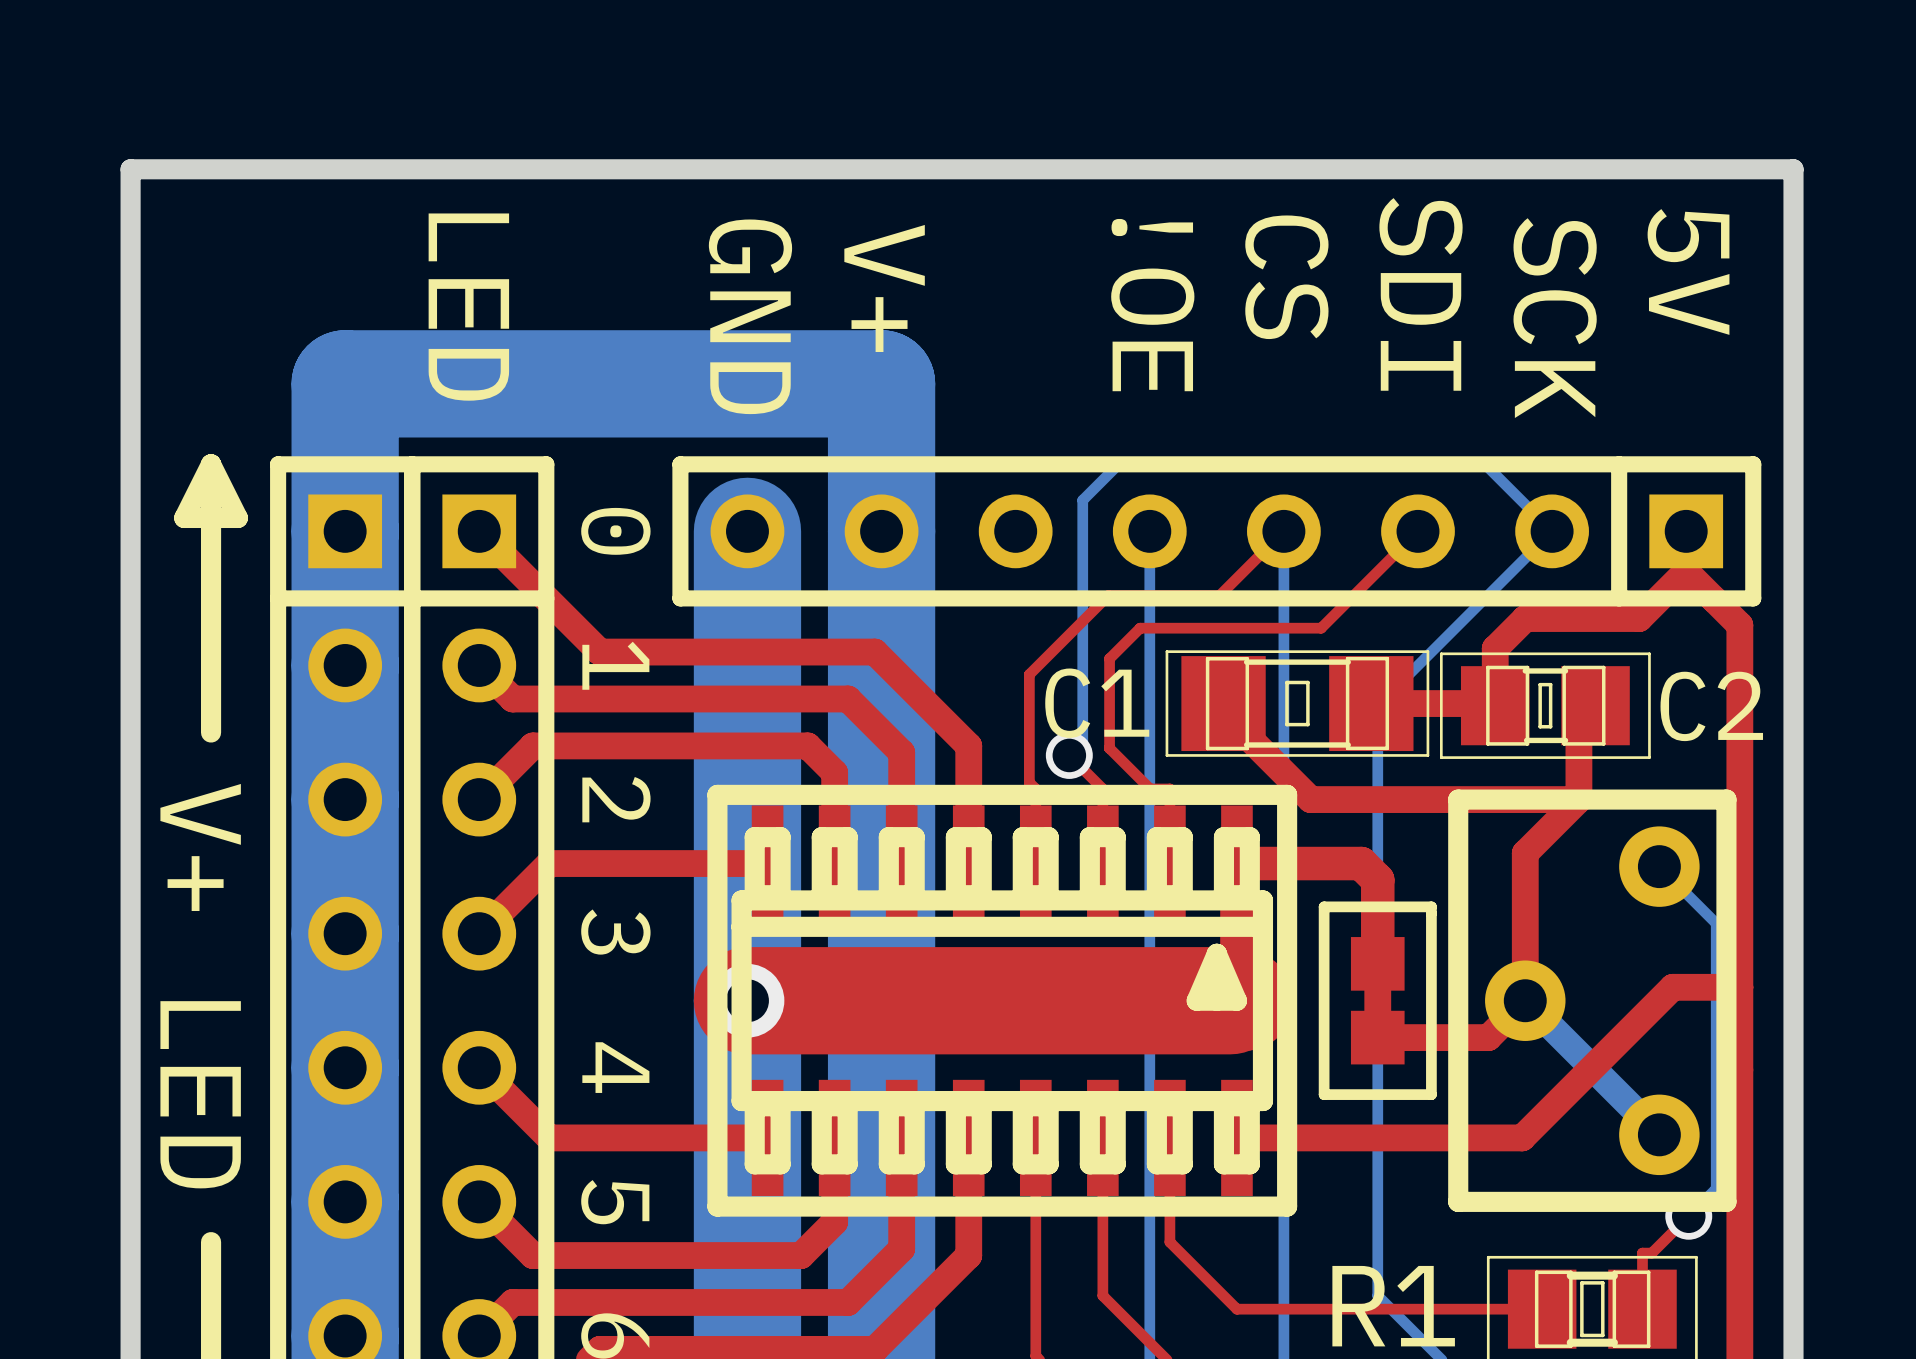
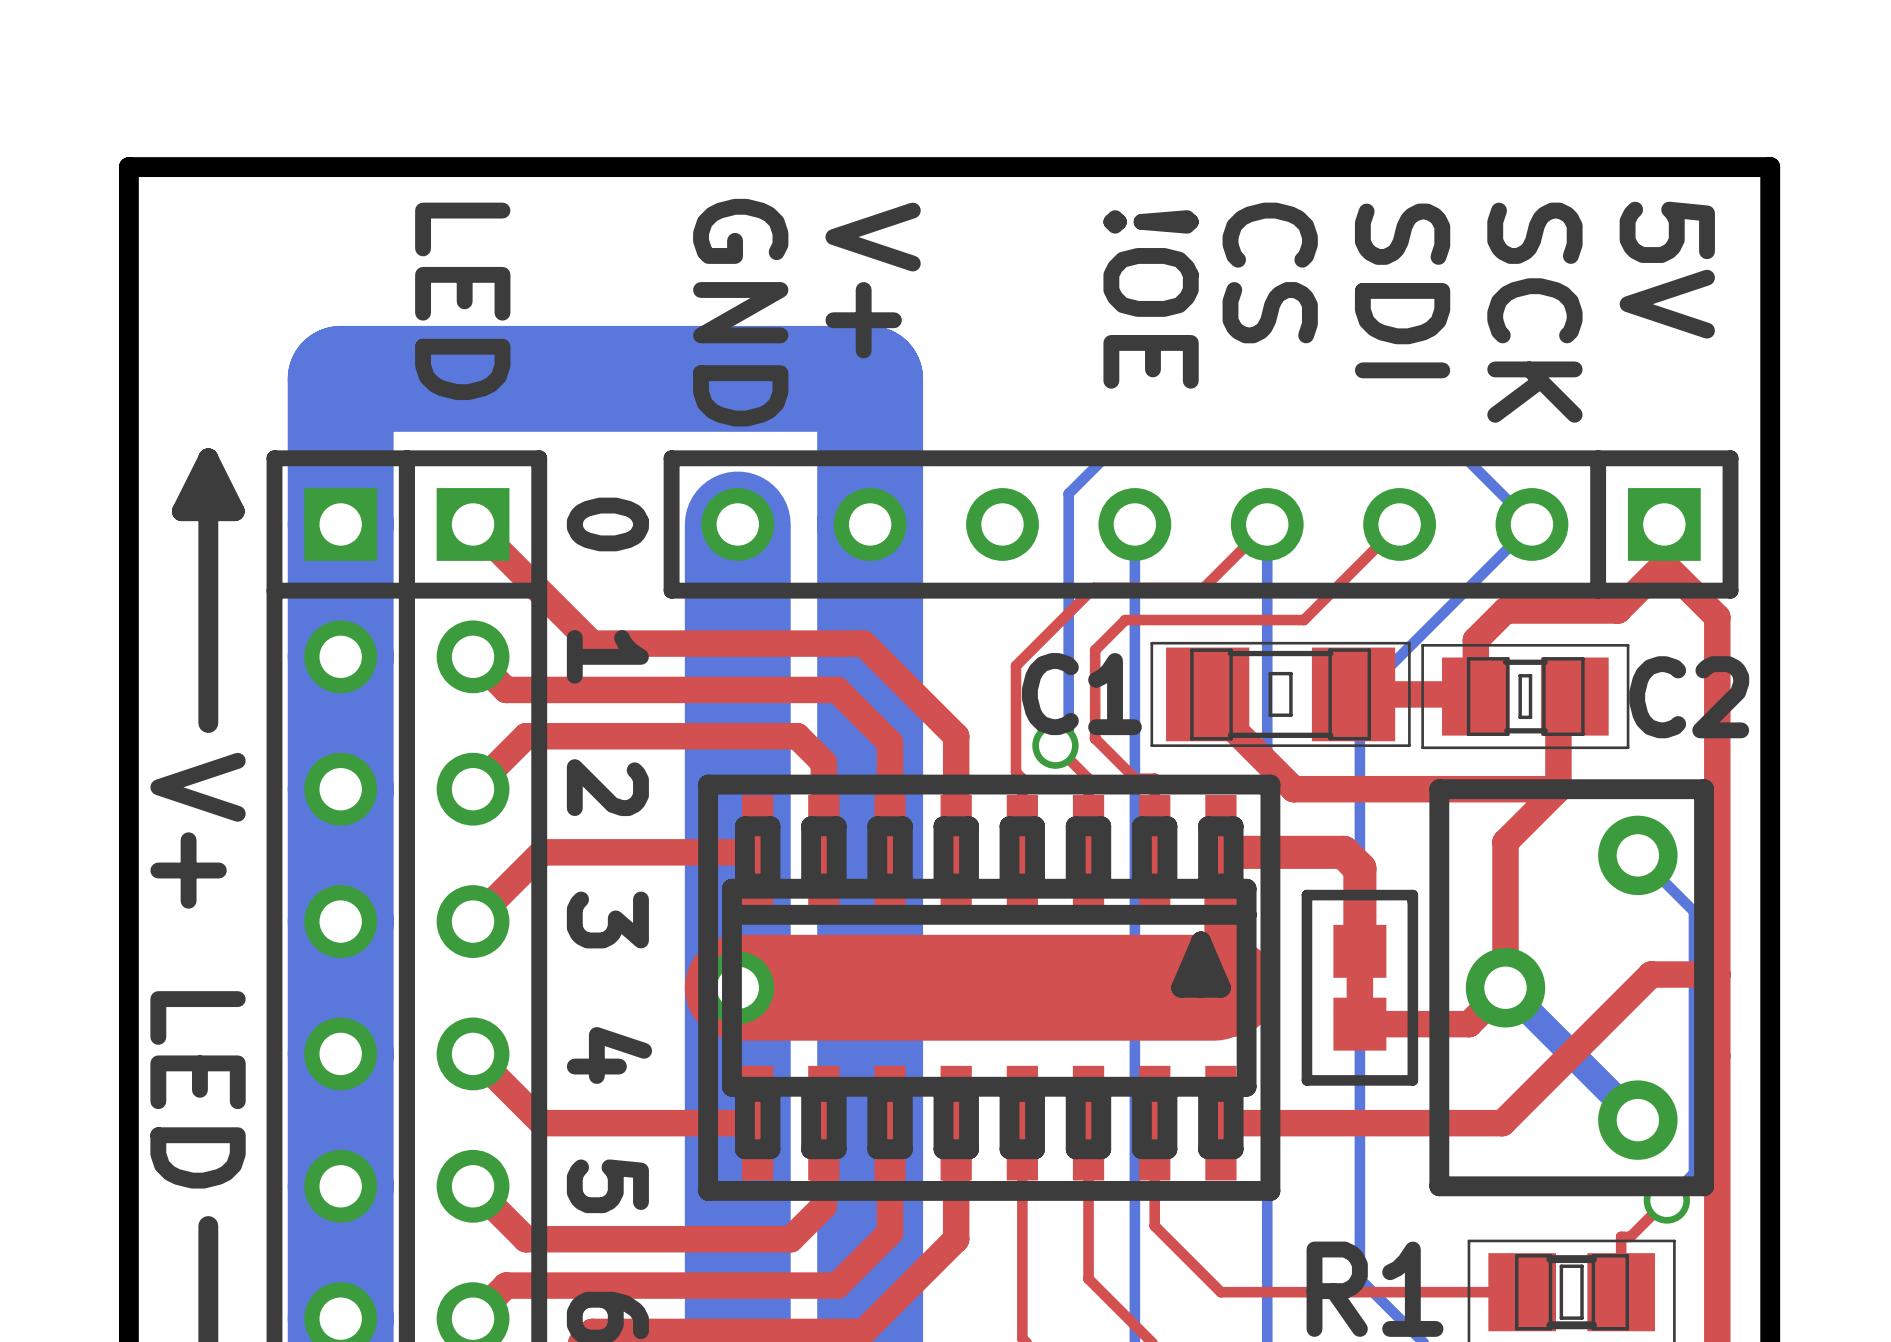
text position: !OE (1152, 305) -> !OE (1151, 299)

